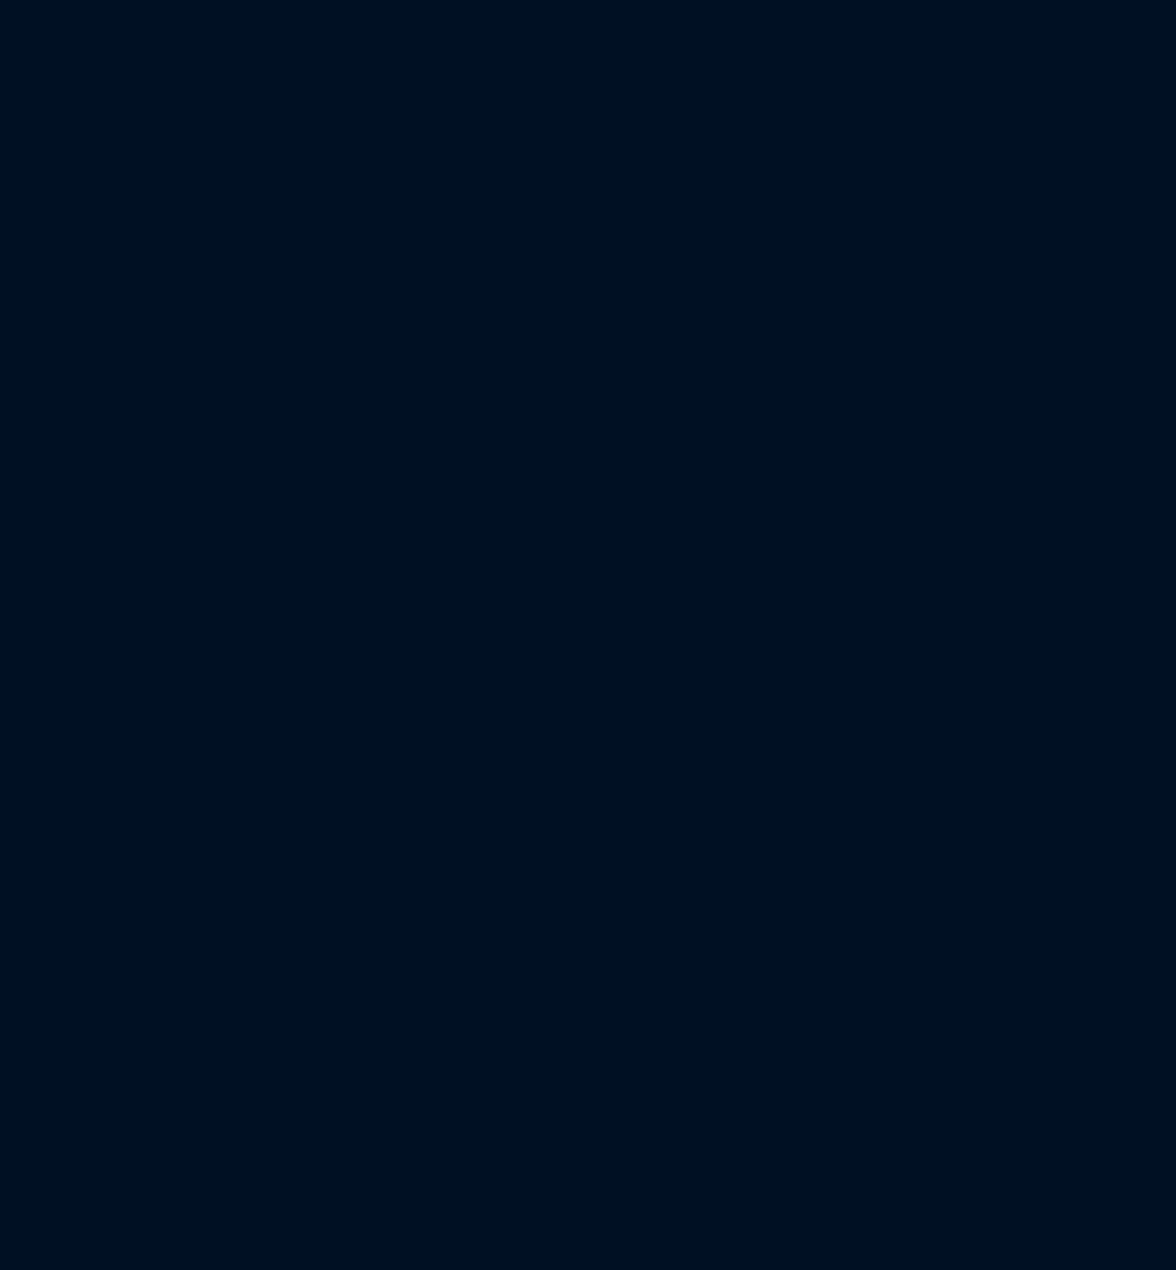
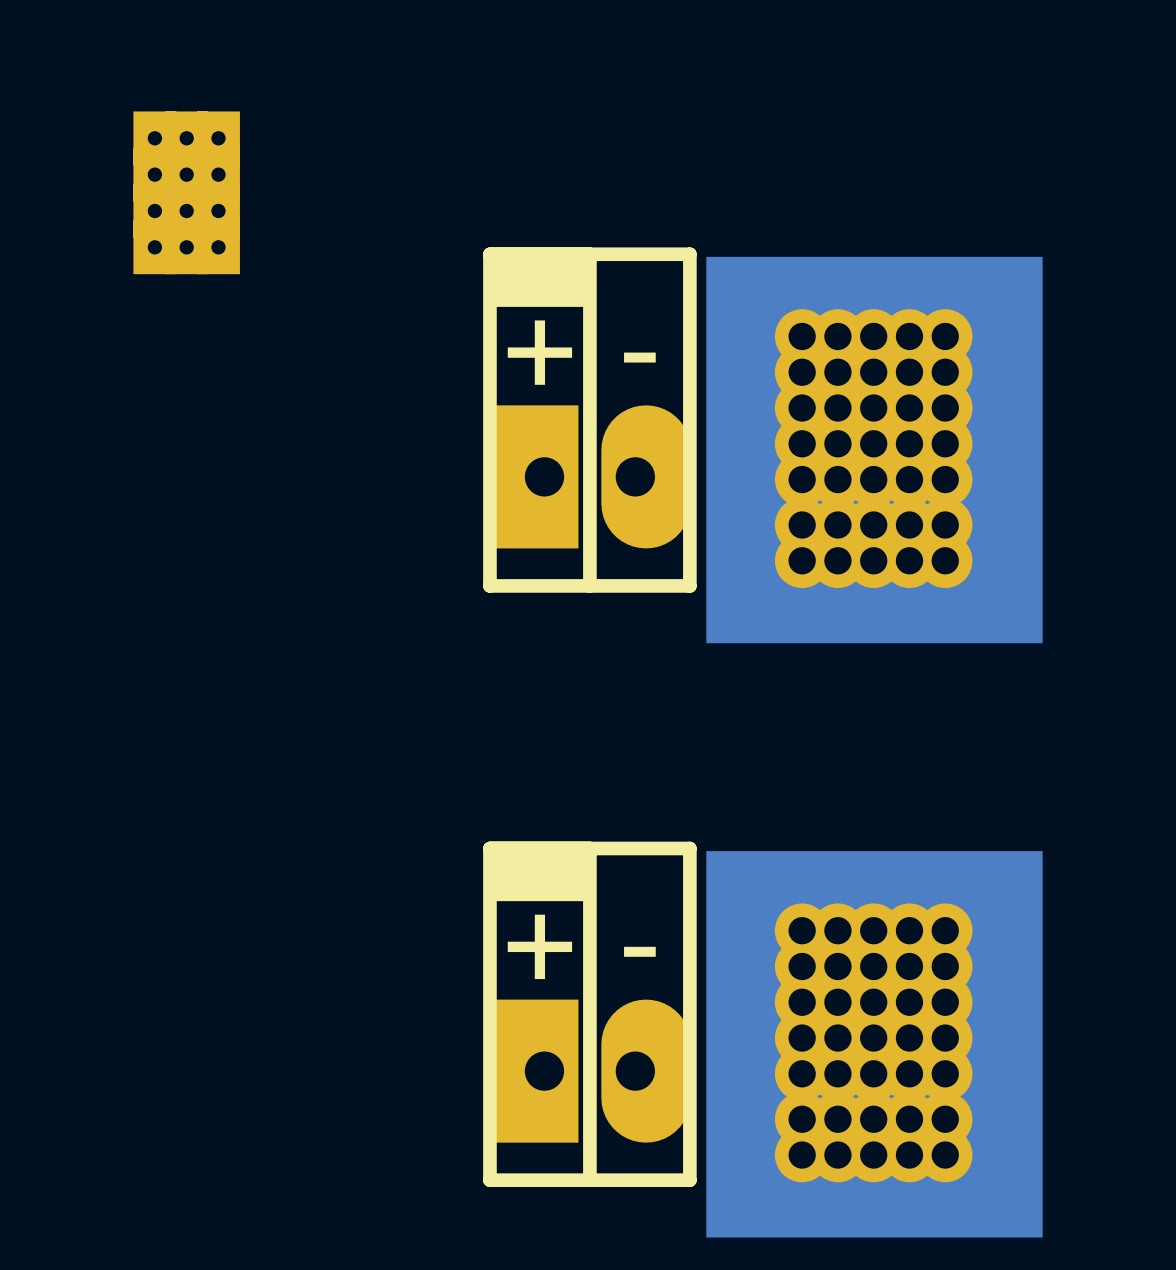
part: none -> (186, 192)
part: none -> (589, 419)
part: none -> (874, 450)
part: none -> (589, 1014)
part: none -> (874, 1044)

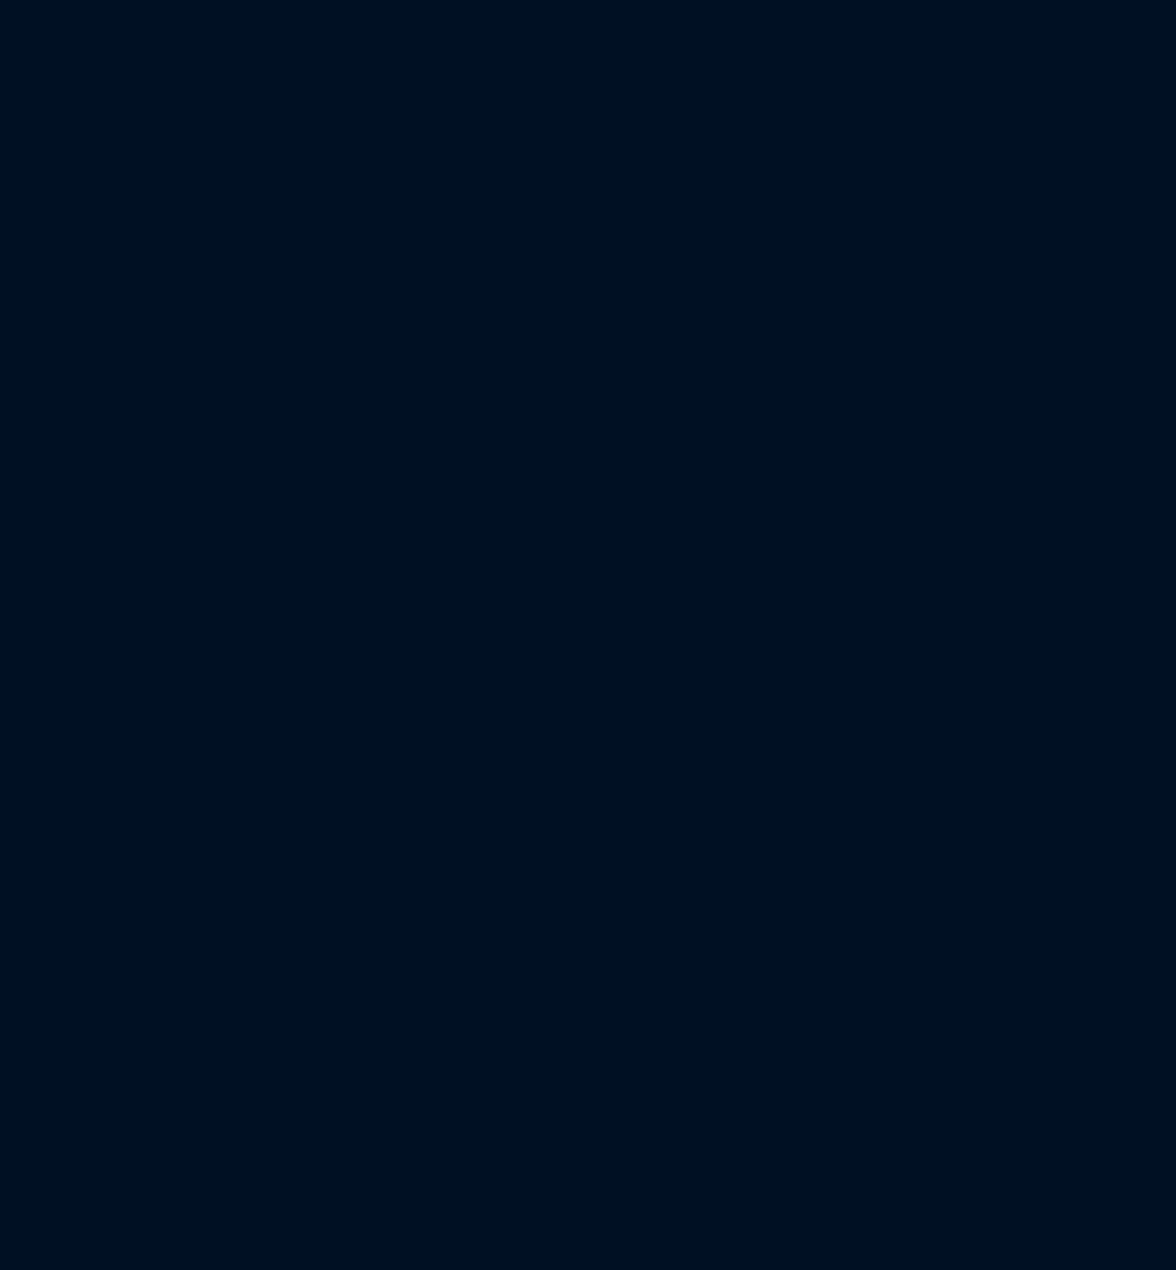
part: (186, 192) -> none
part: (589, 419) -> none
part: (874, 450) -> none
part: (589, 1014) -> none
part: (874, 1044) -> none

